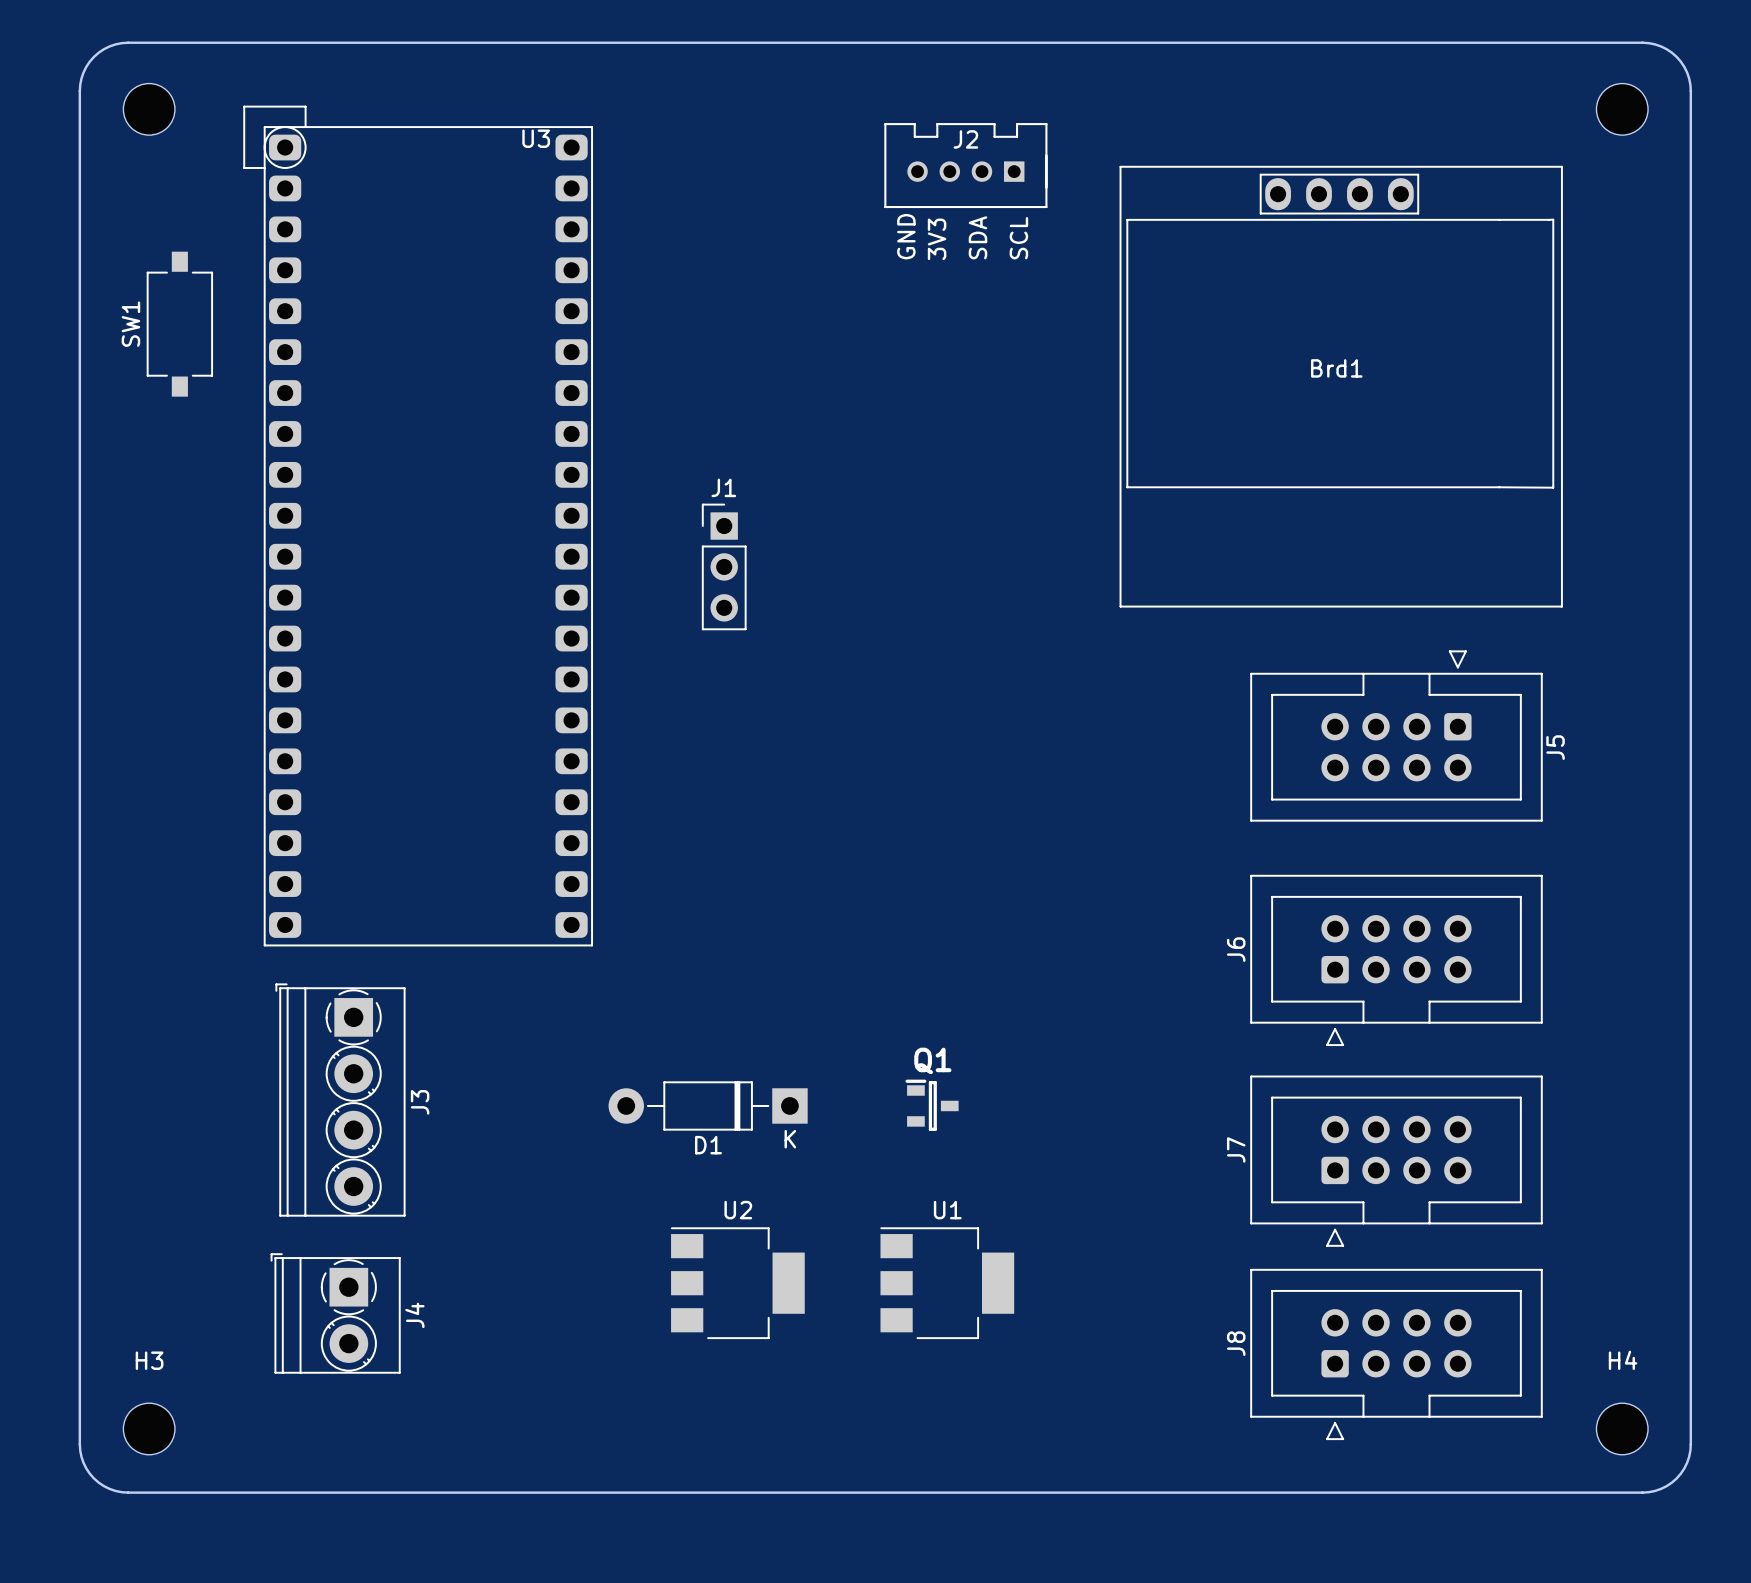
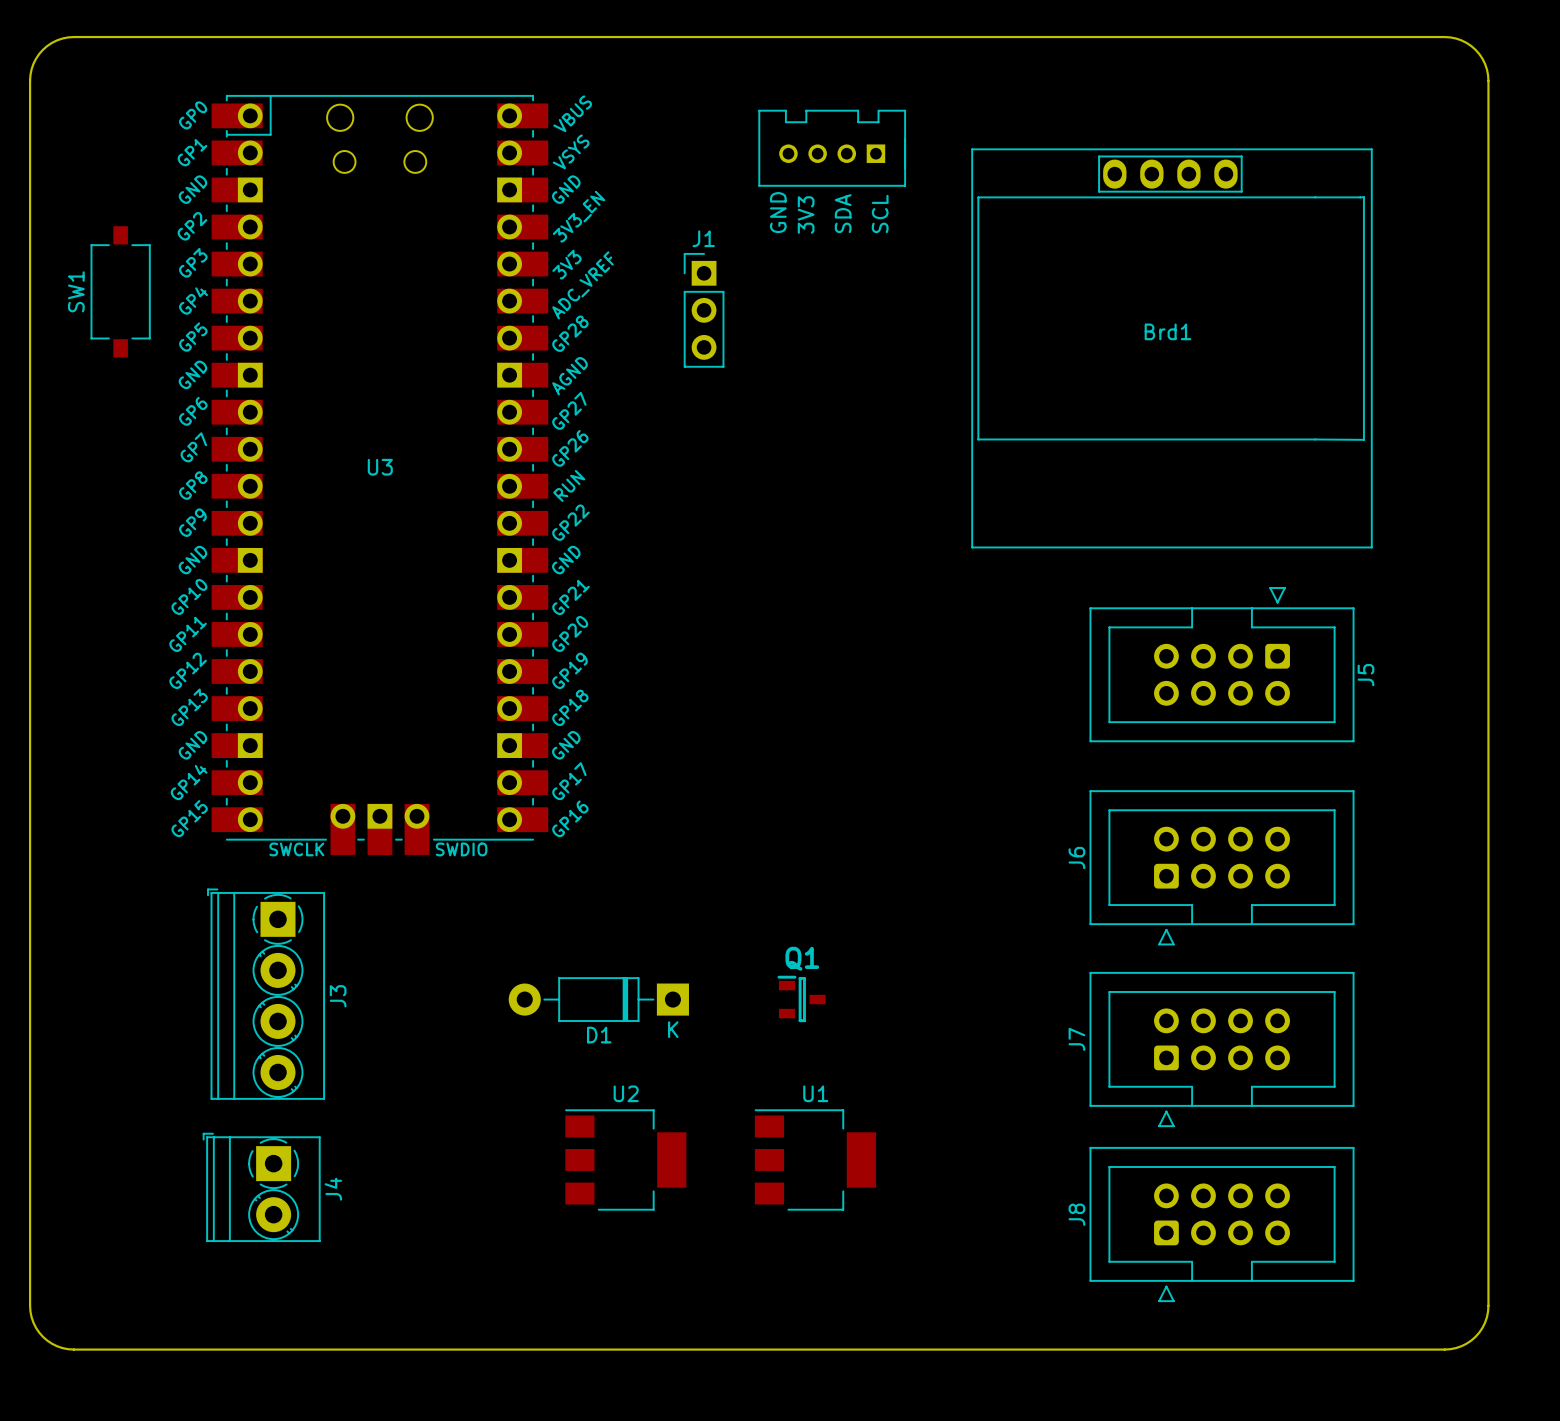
U3 footprint: [243, 105, 594, 947] -> [211, 95, 549, 855]
part: (149, 109) -> none
part: (1622, 109) -> none
U3 name position: U3 (536, 138) -> U3 (380, 467)
J2 name: J2 (965, 139) -> none
J1 position: (724, 566) -> (704, 310)
H3: (149, 1428) -> none
H4: (1622, 1428) -> none

